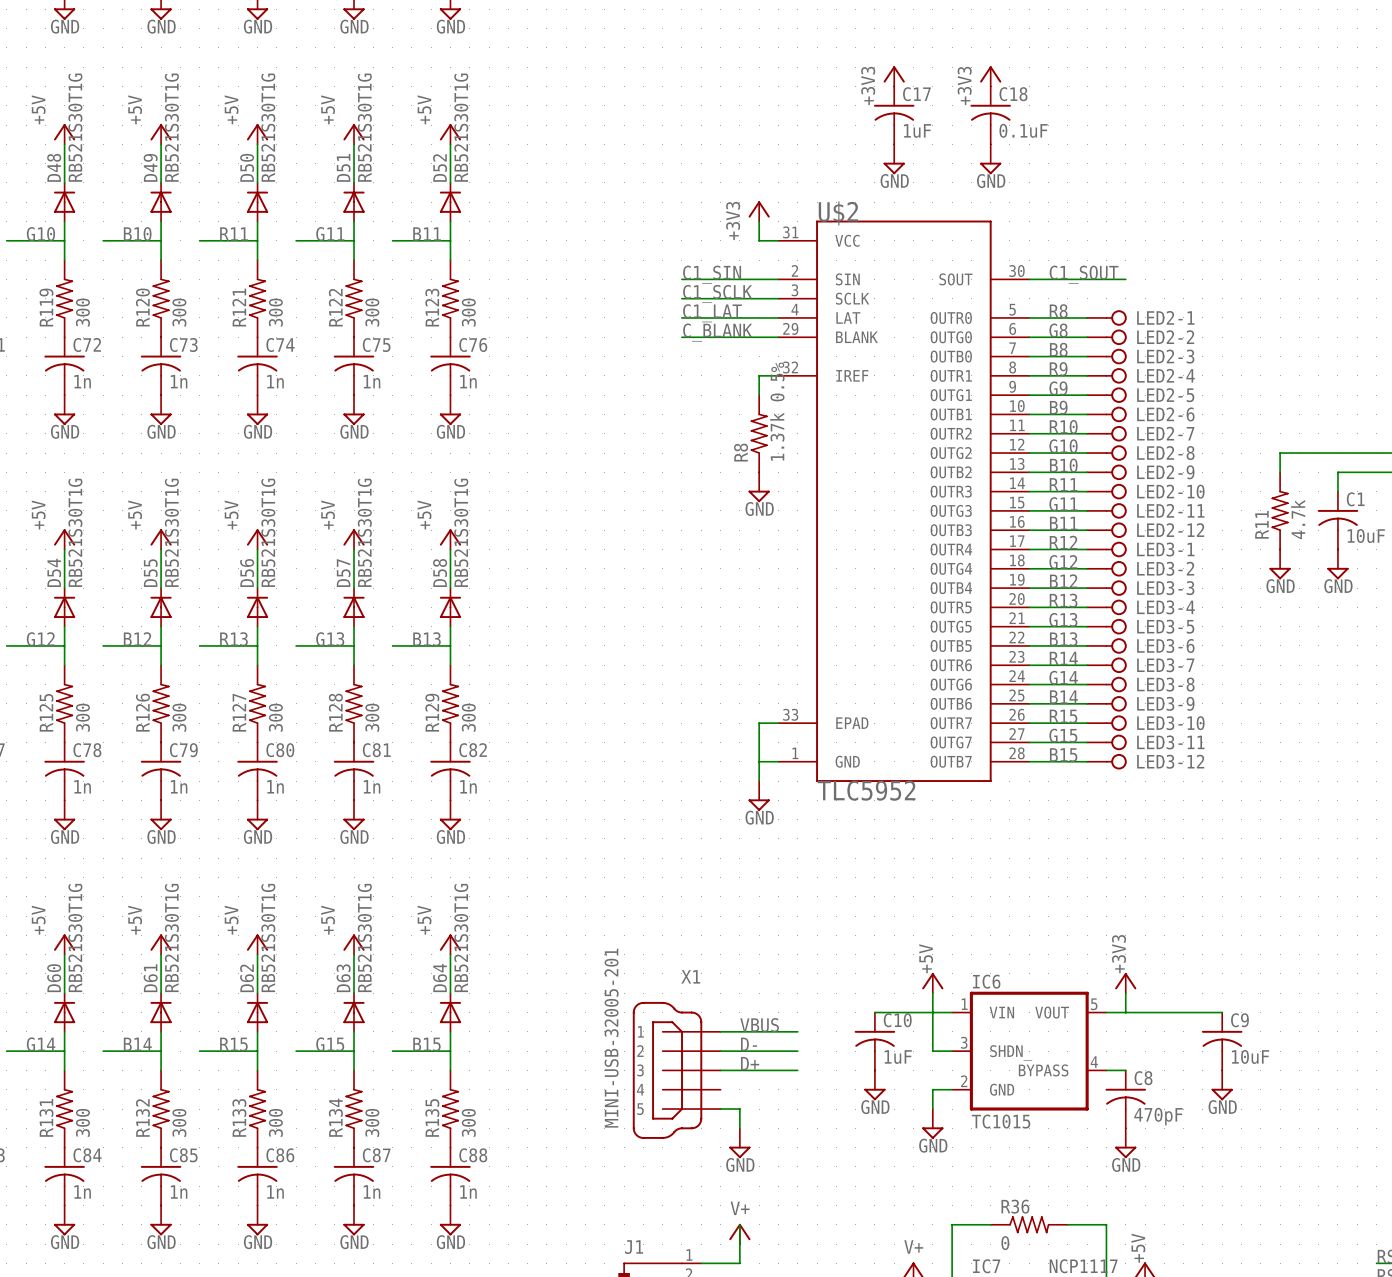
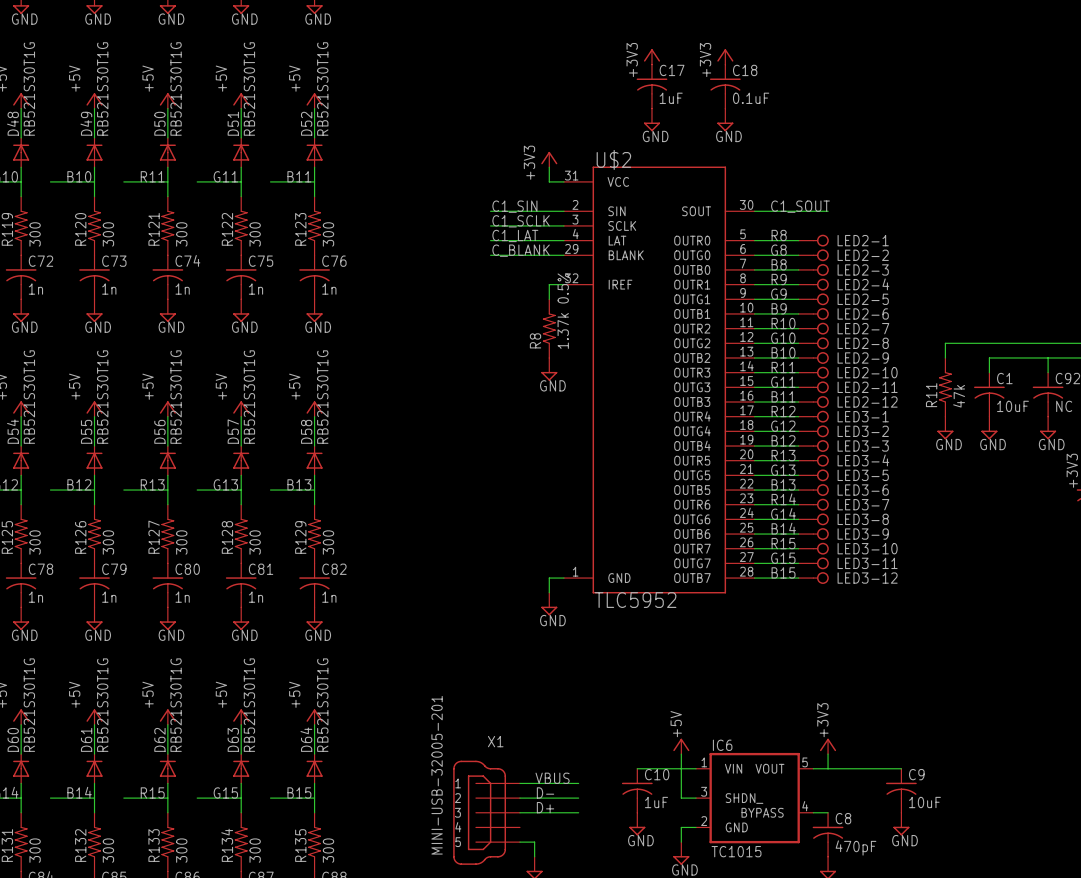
U$2 symbol: [778, 220, 1030, 782] -> [563, 166, 755, 594]
R11 value: 4.7k (1298, 519) -> 47k (959, 396)
wire: (778, 723) (759, 723) (759, 761) -> none

